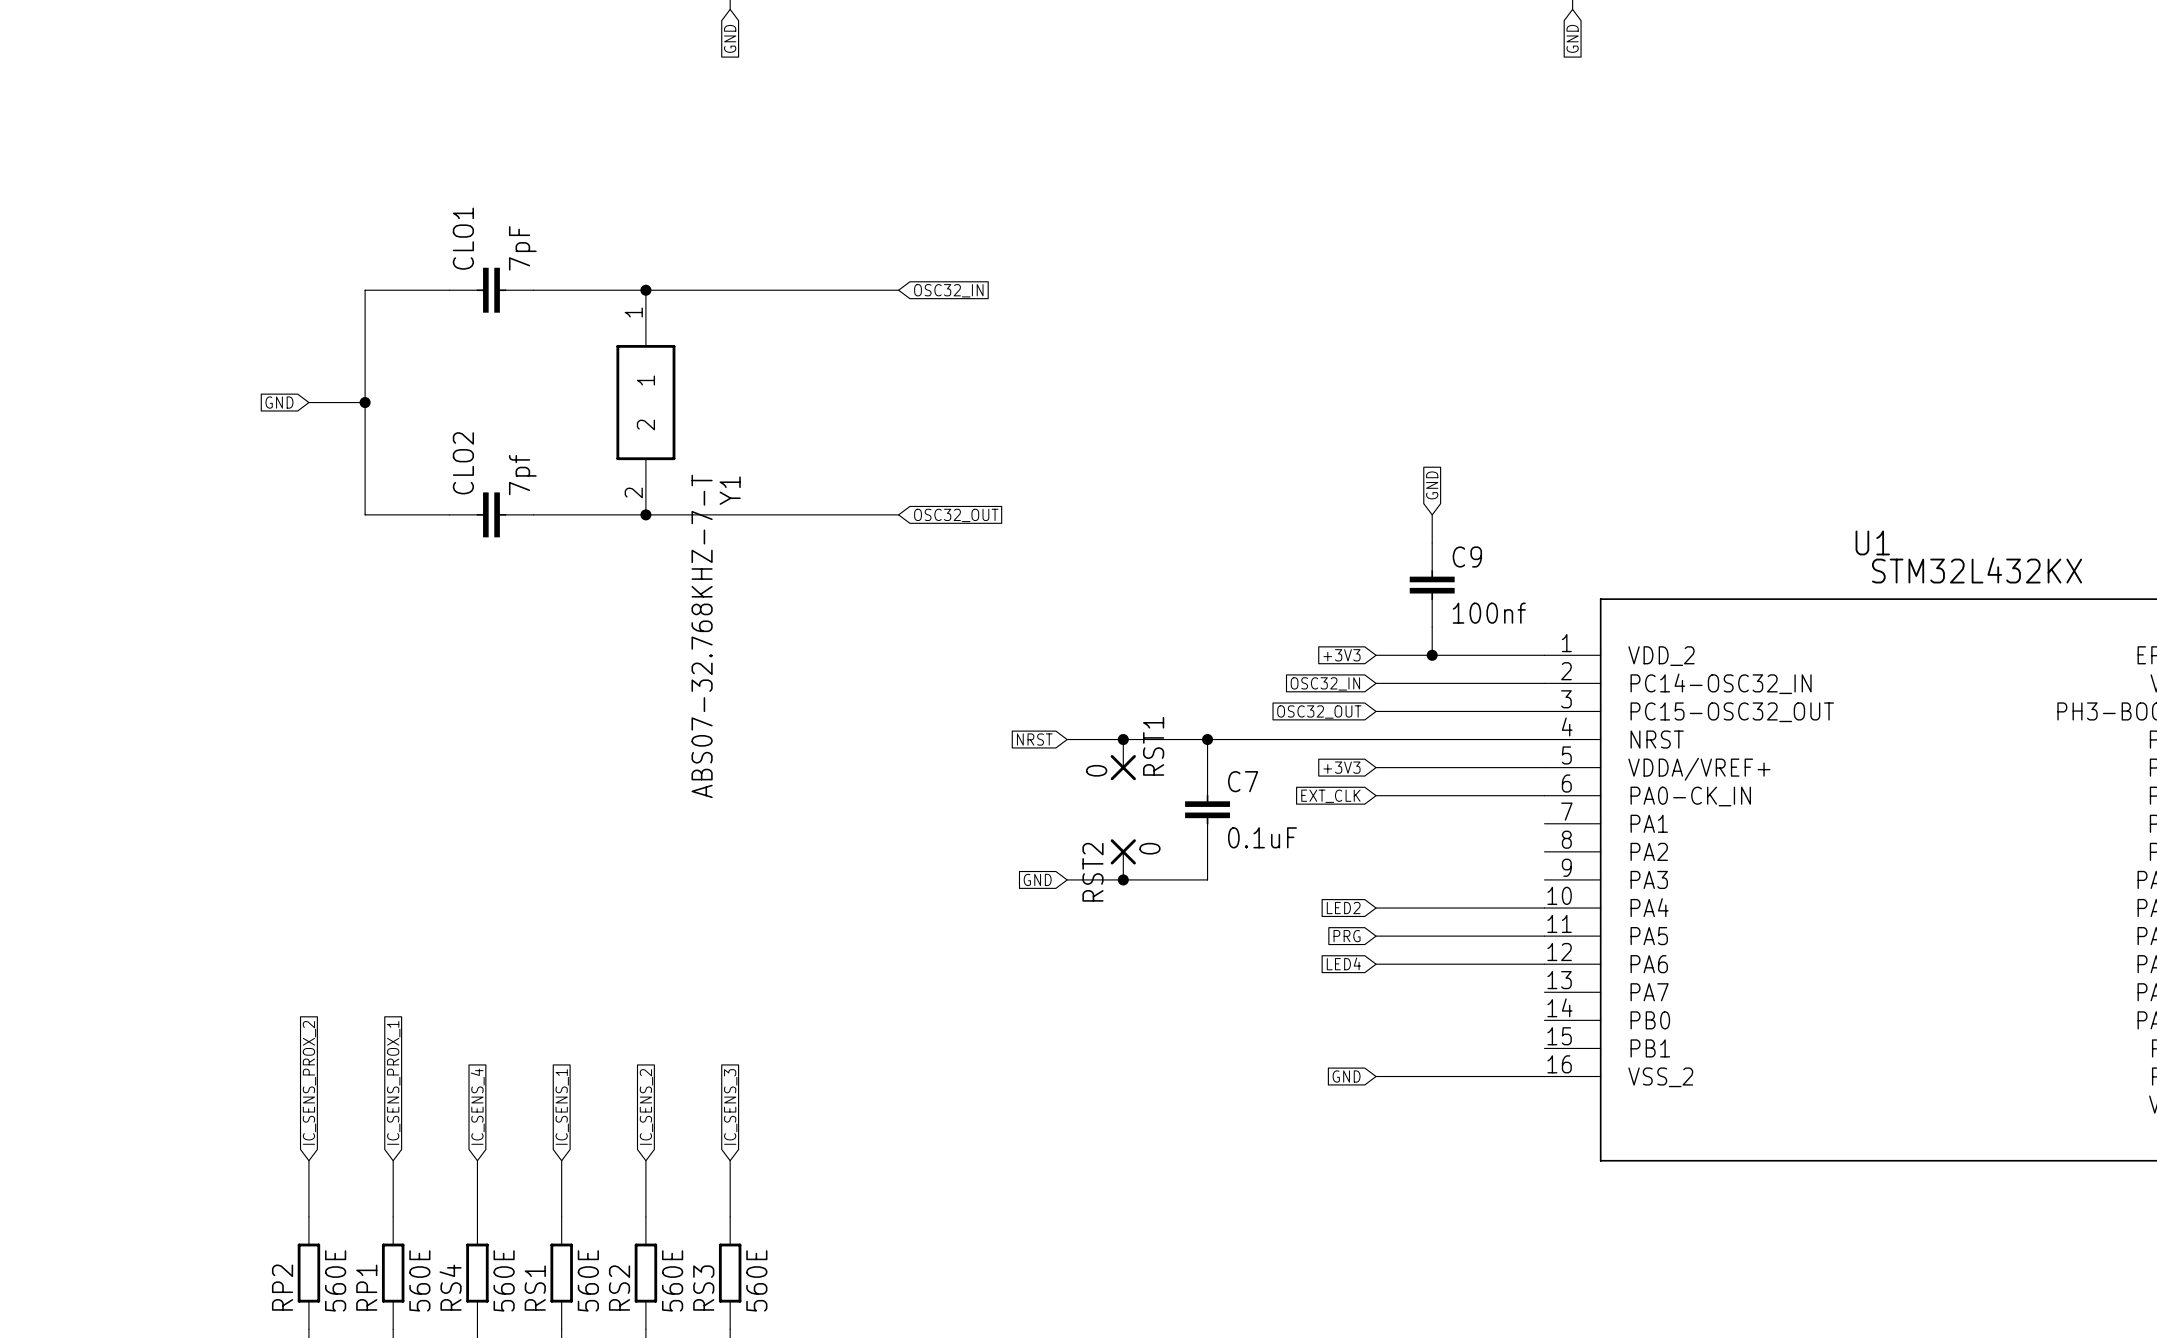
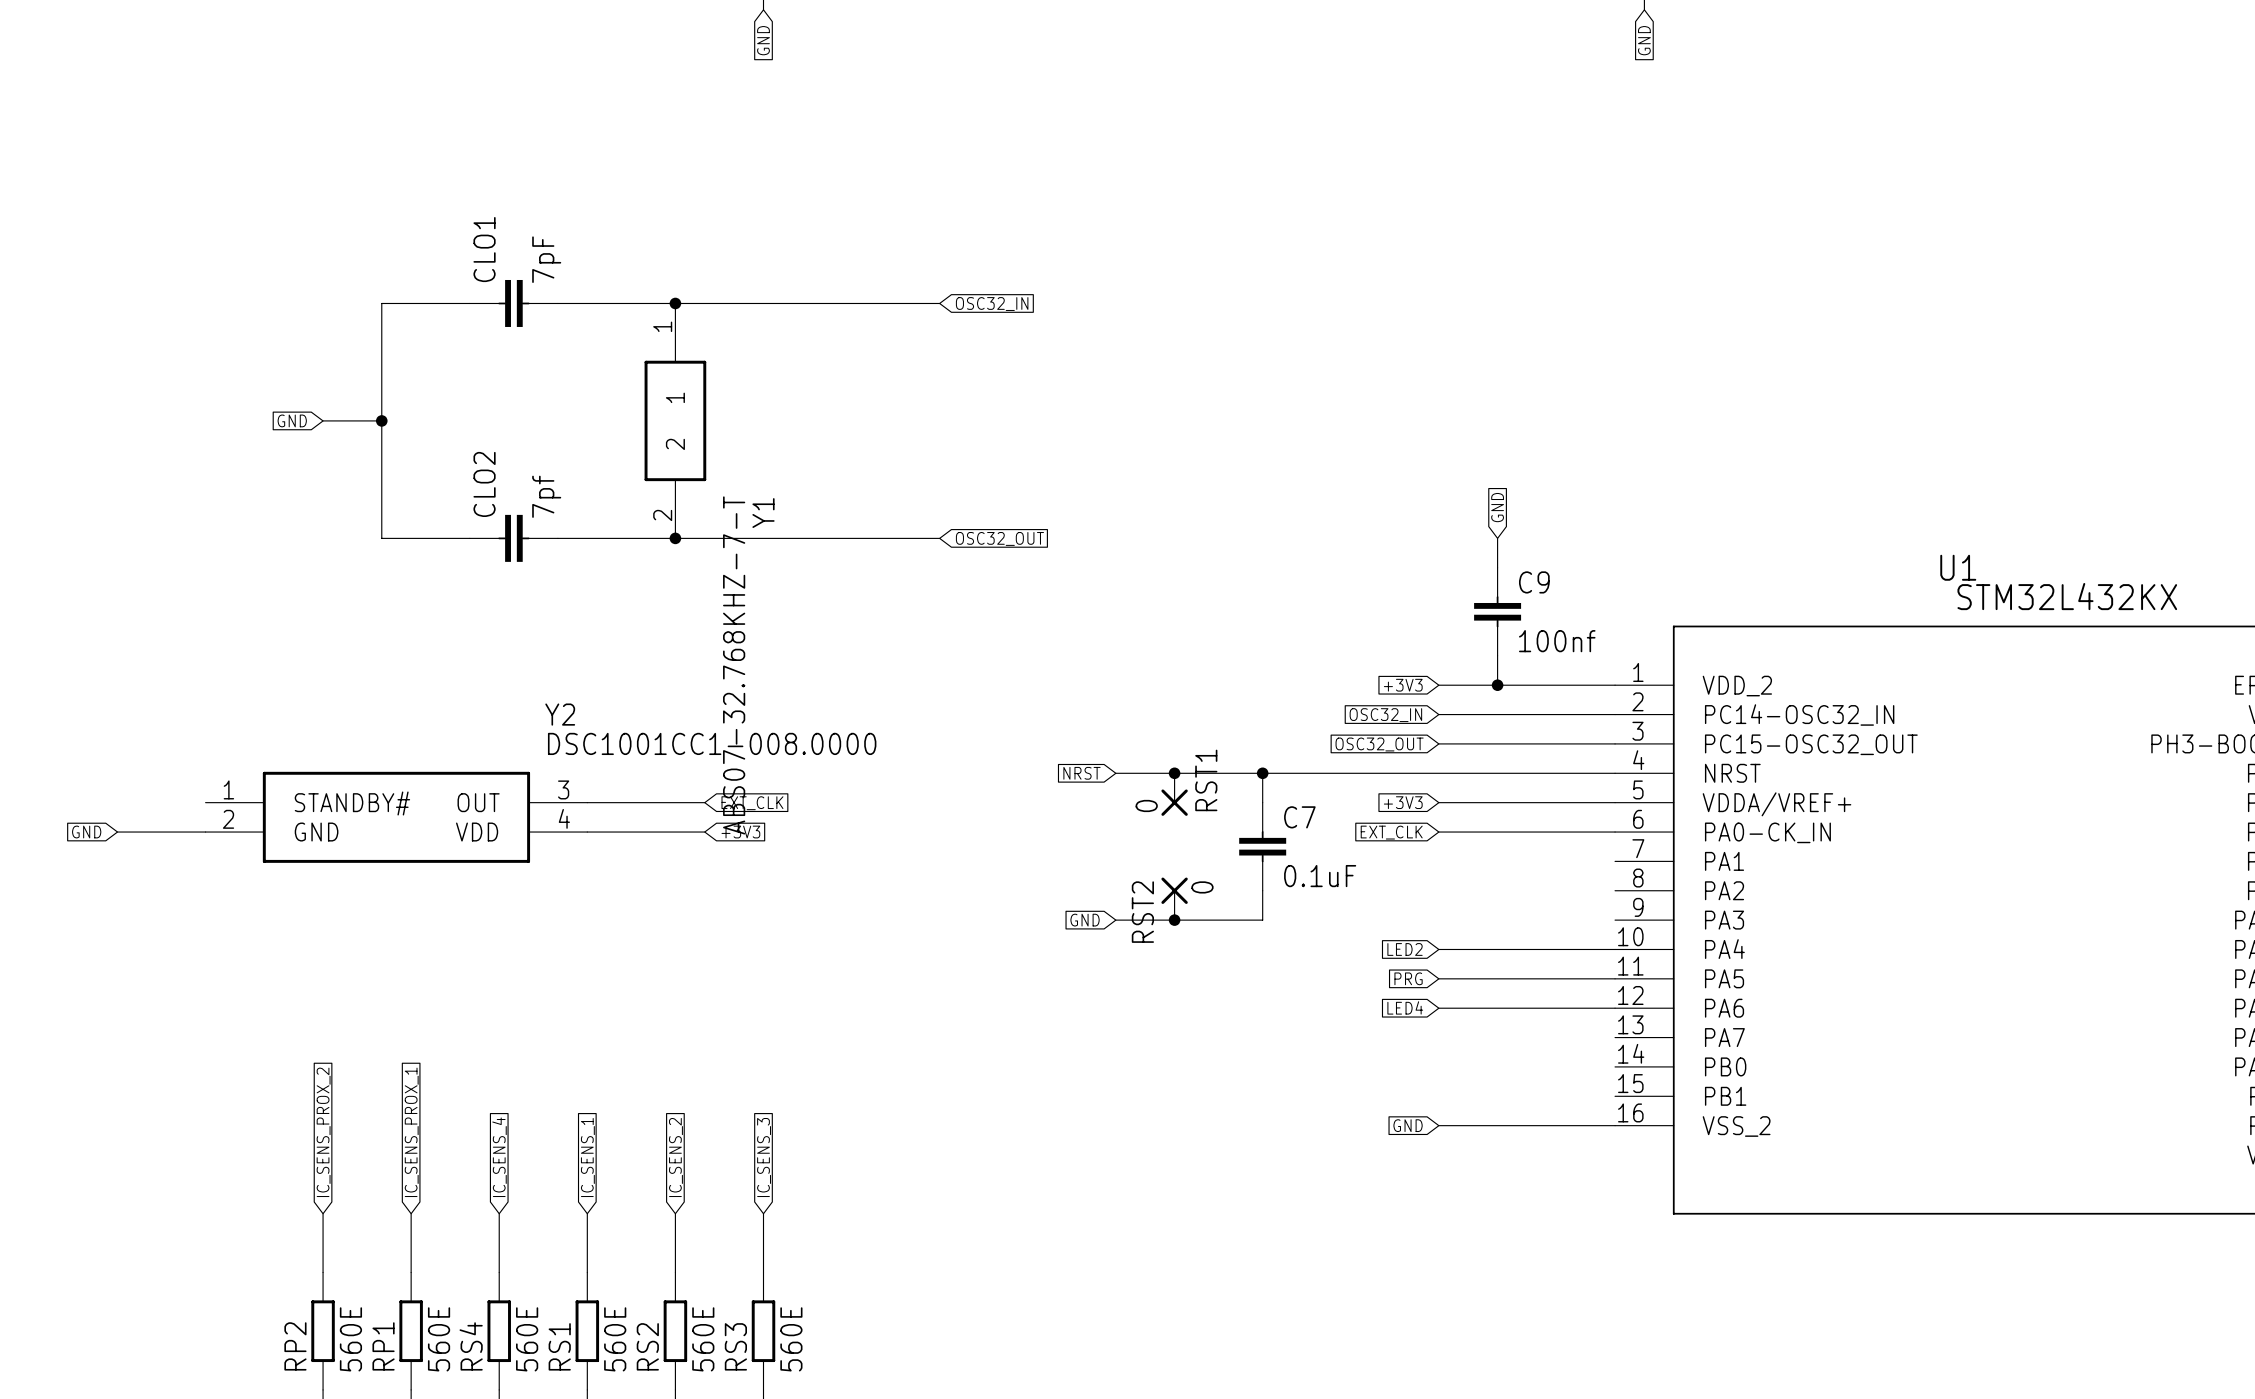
wire: none -> (587, 802) (704, 802)
global label: none -> EXT_CLK (752, 803)
Y2: none -> DSC1001CC1-008.0000 (396, 817)
global label: none -> GND (86, 832)
wire: none -> (117, 832) (205, 832)
wire: none -> (587, 832) (704, 832)
global label: none -> +3V3 (740, 832)

